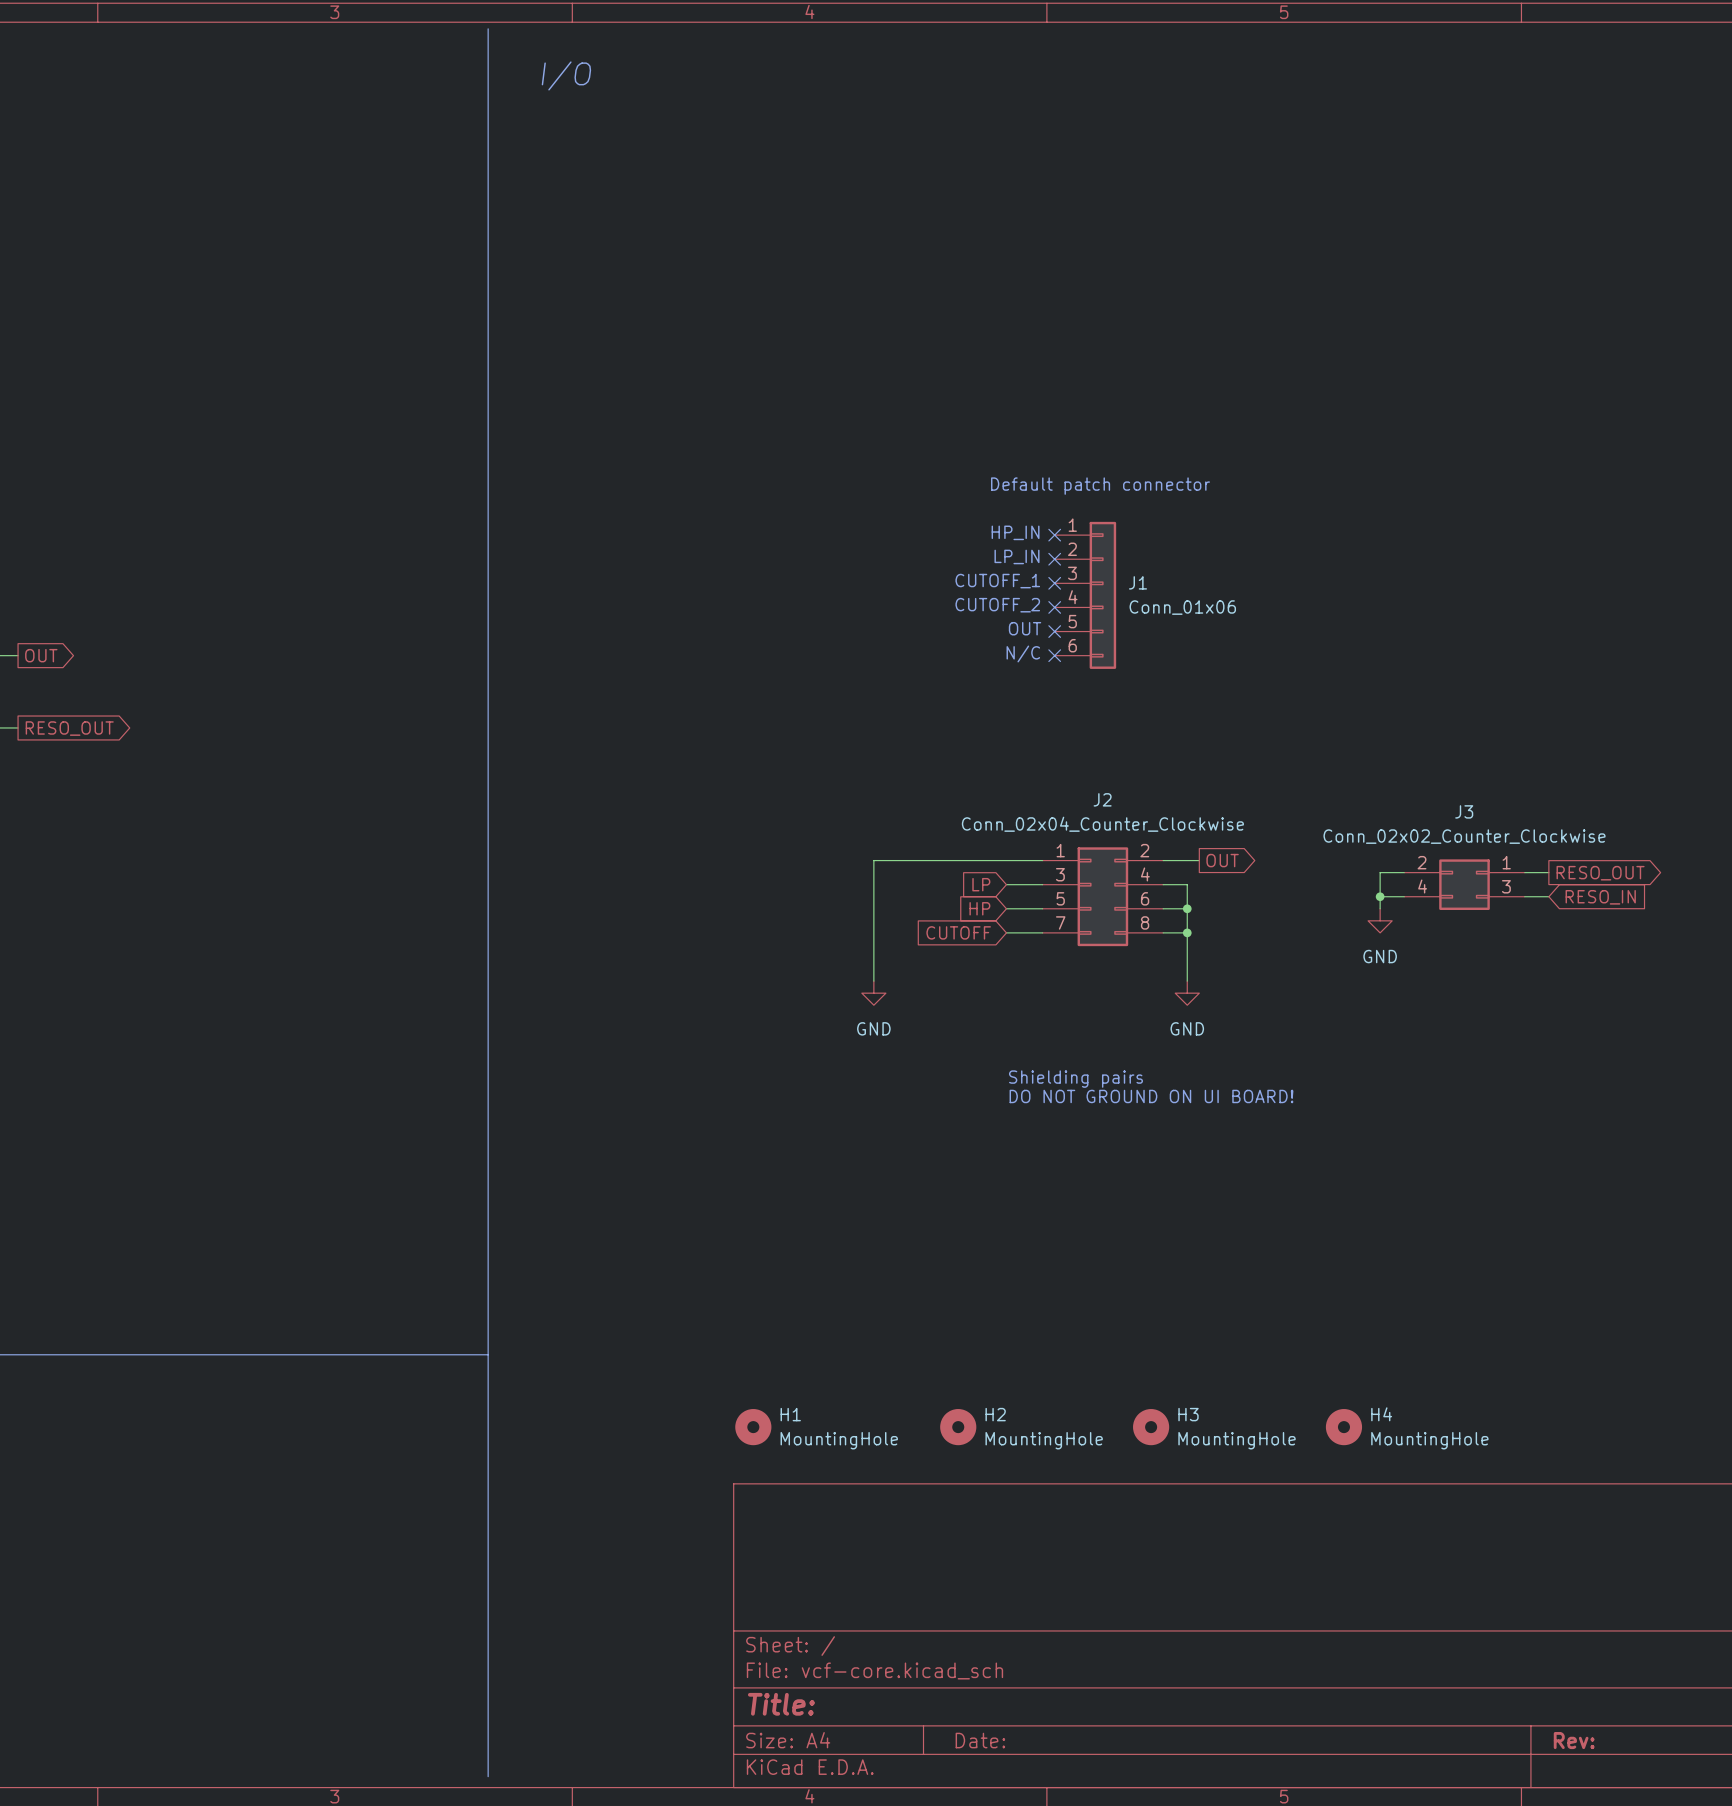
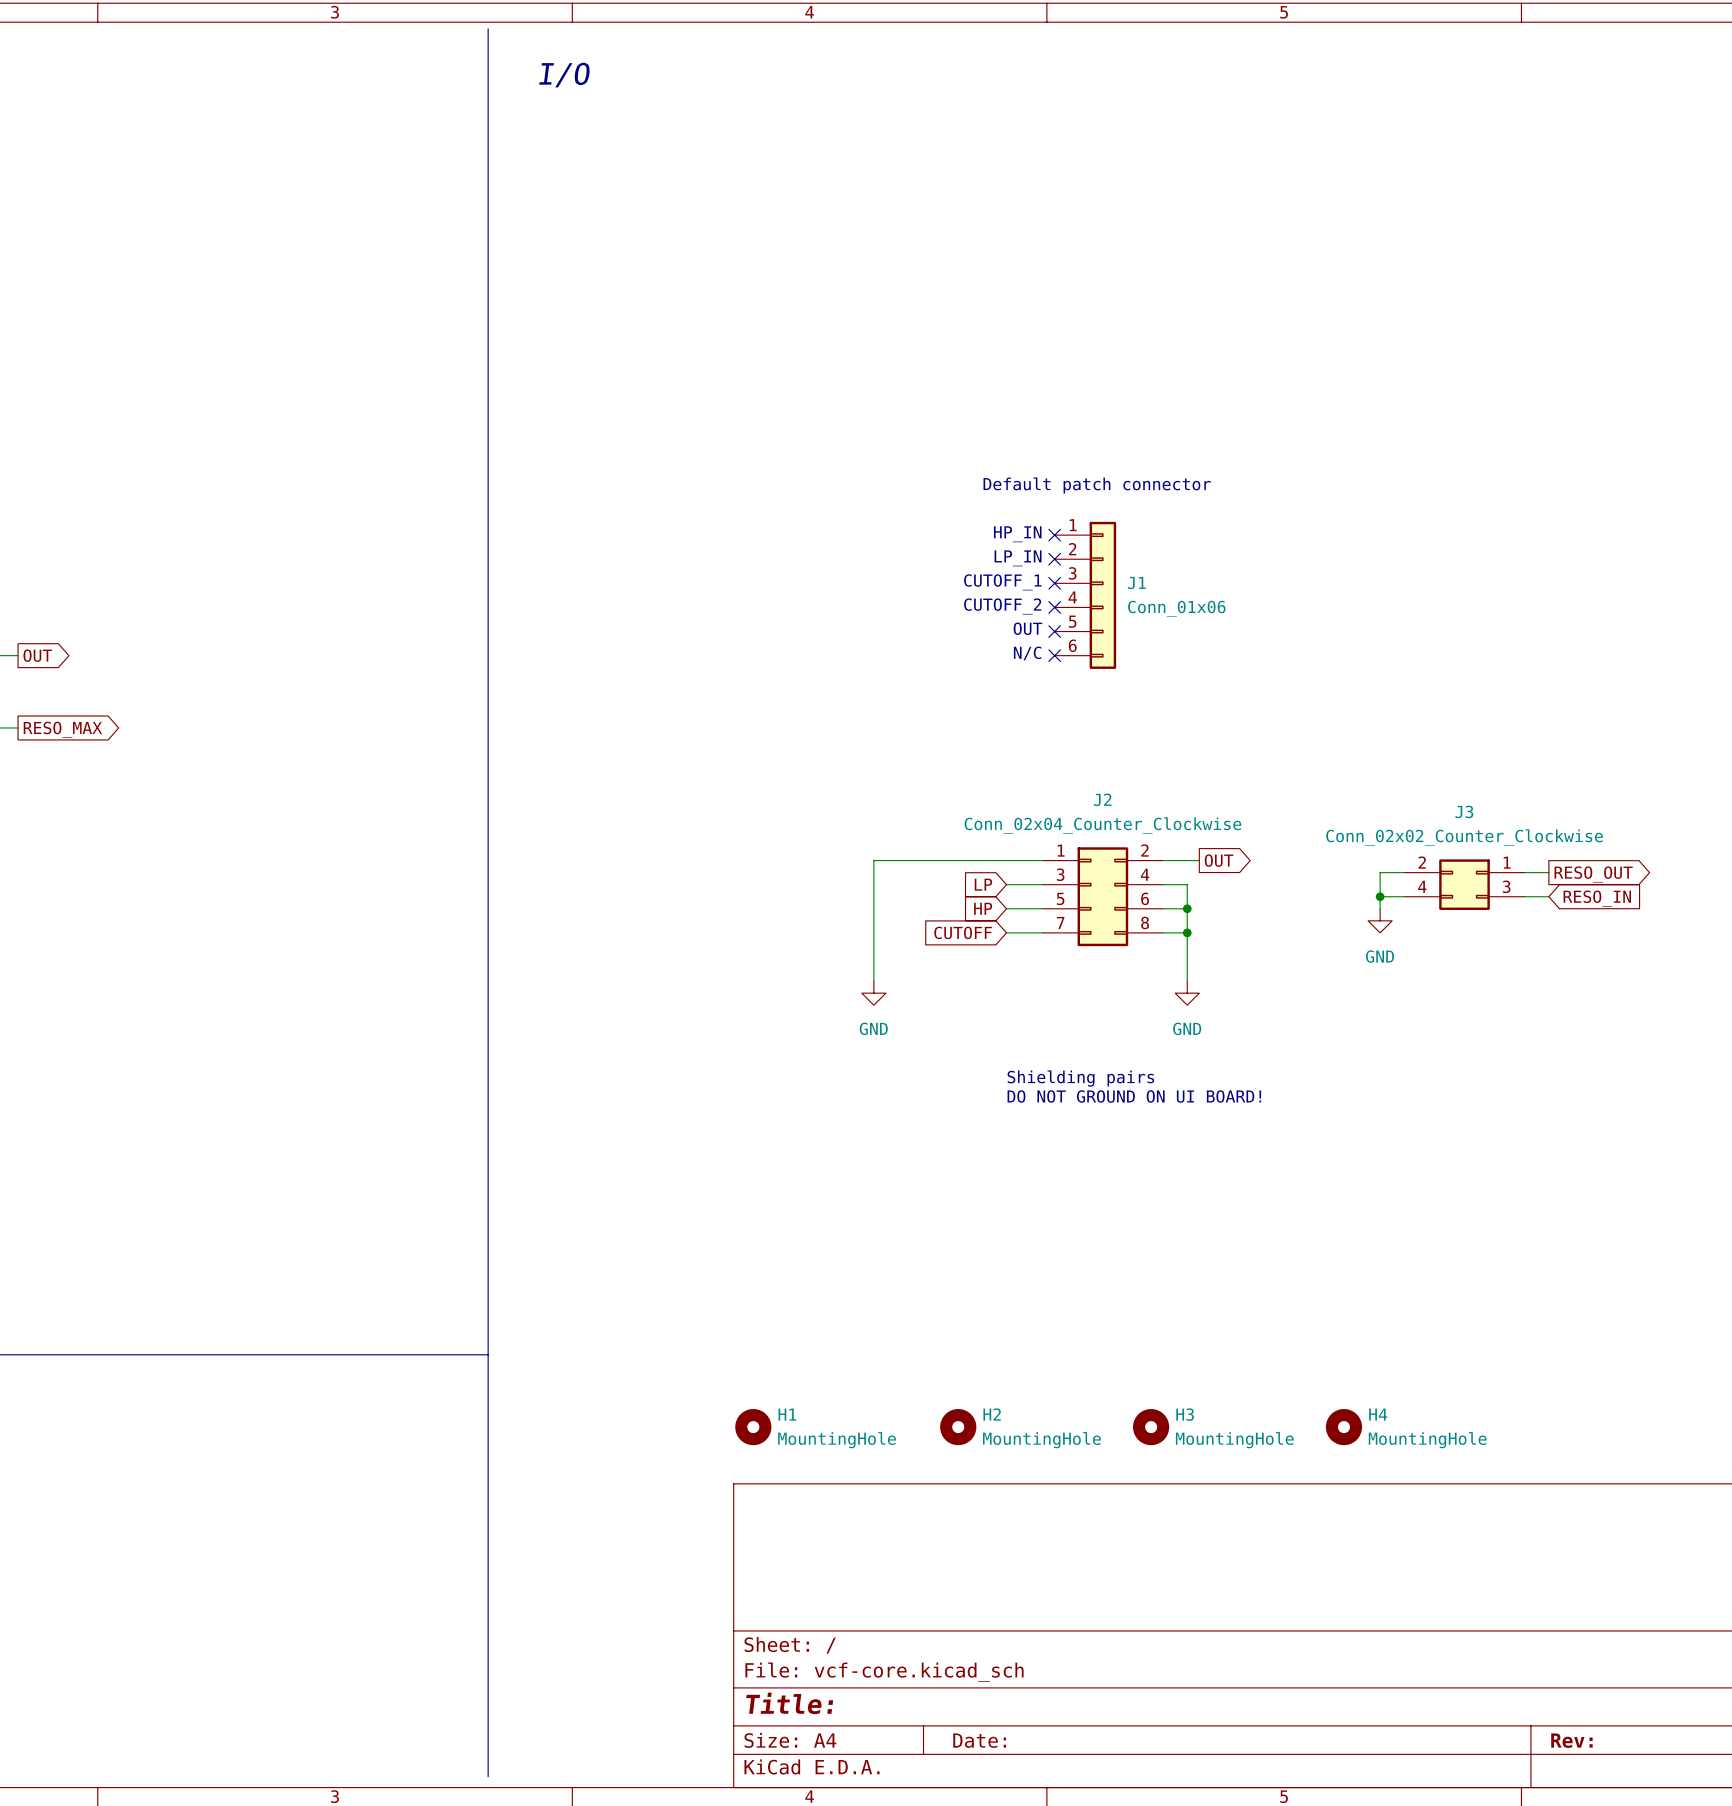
global label: RESO_OUT (69, 728) -> RESO_MAX (62, 729)

